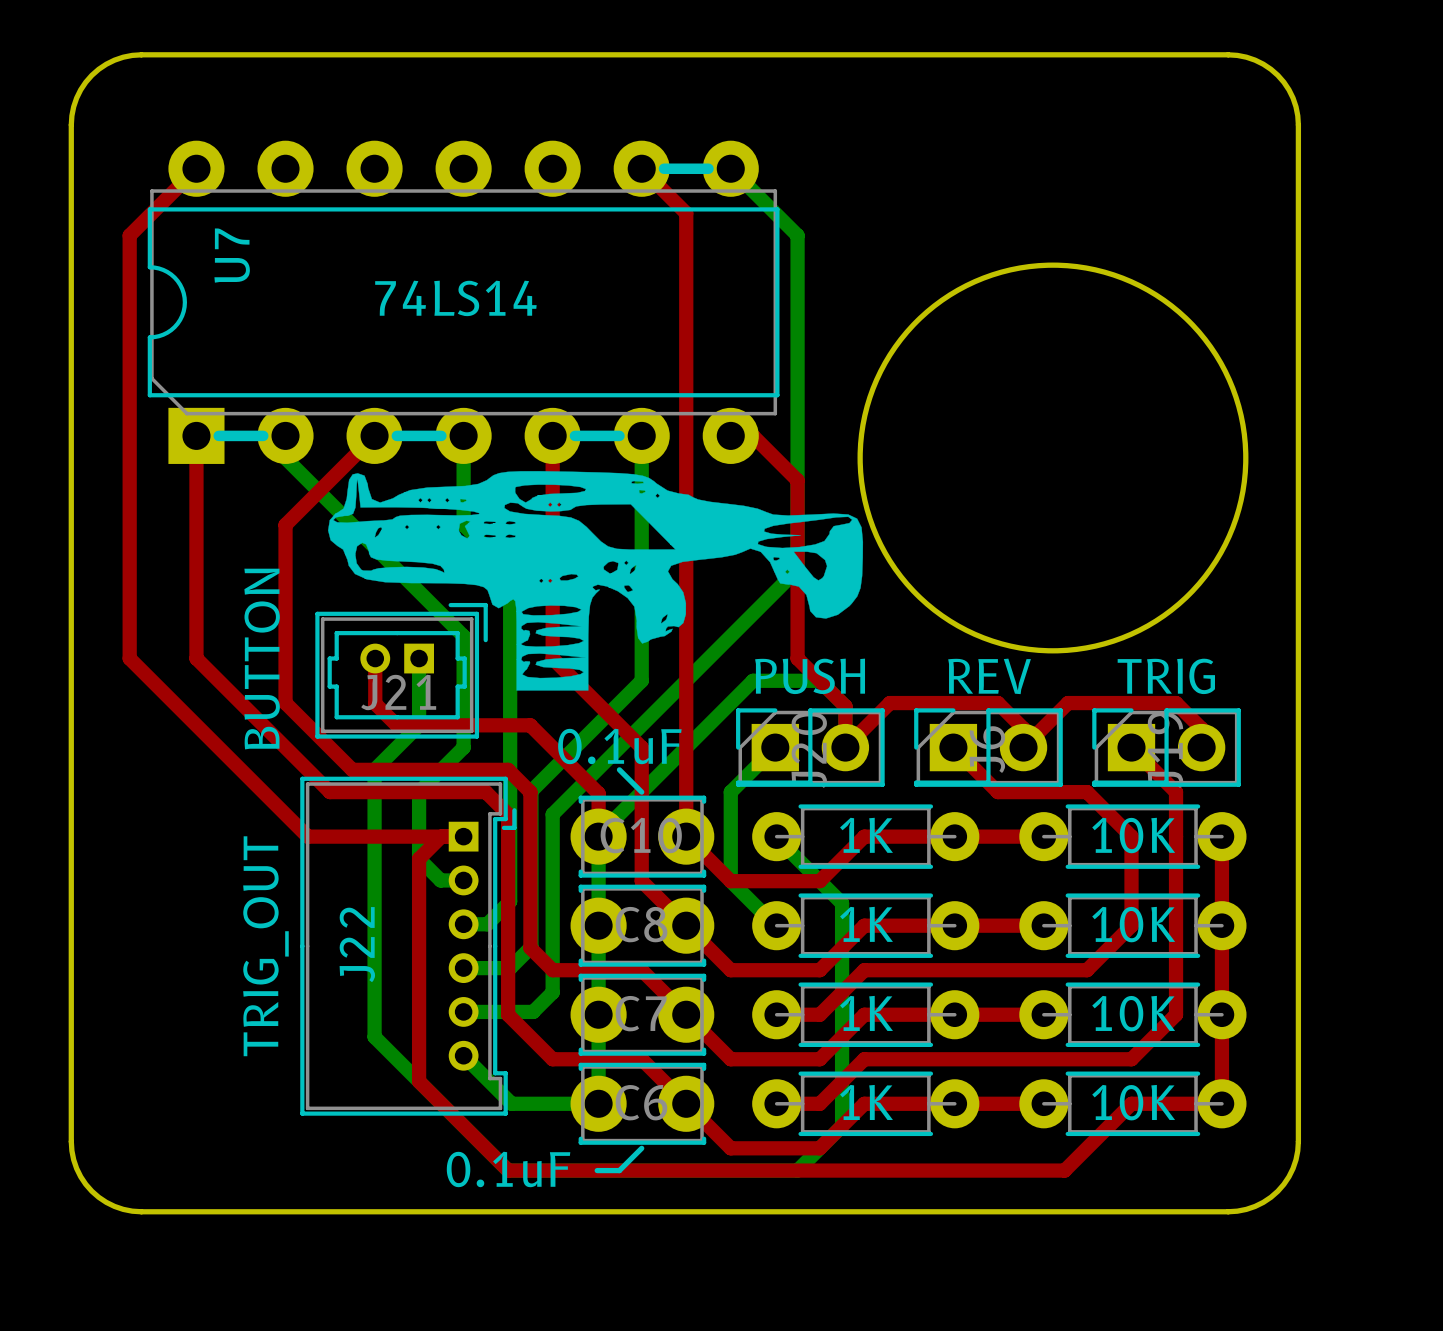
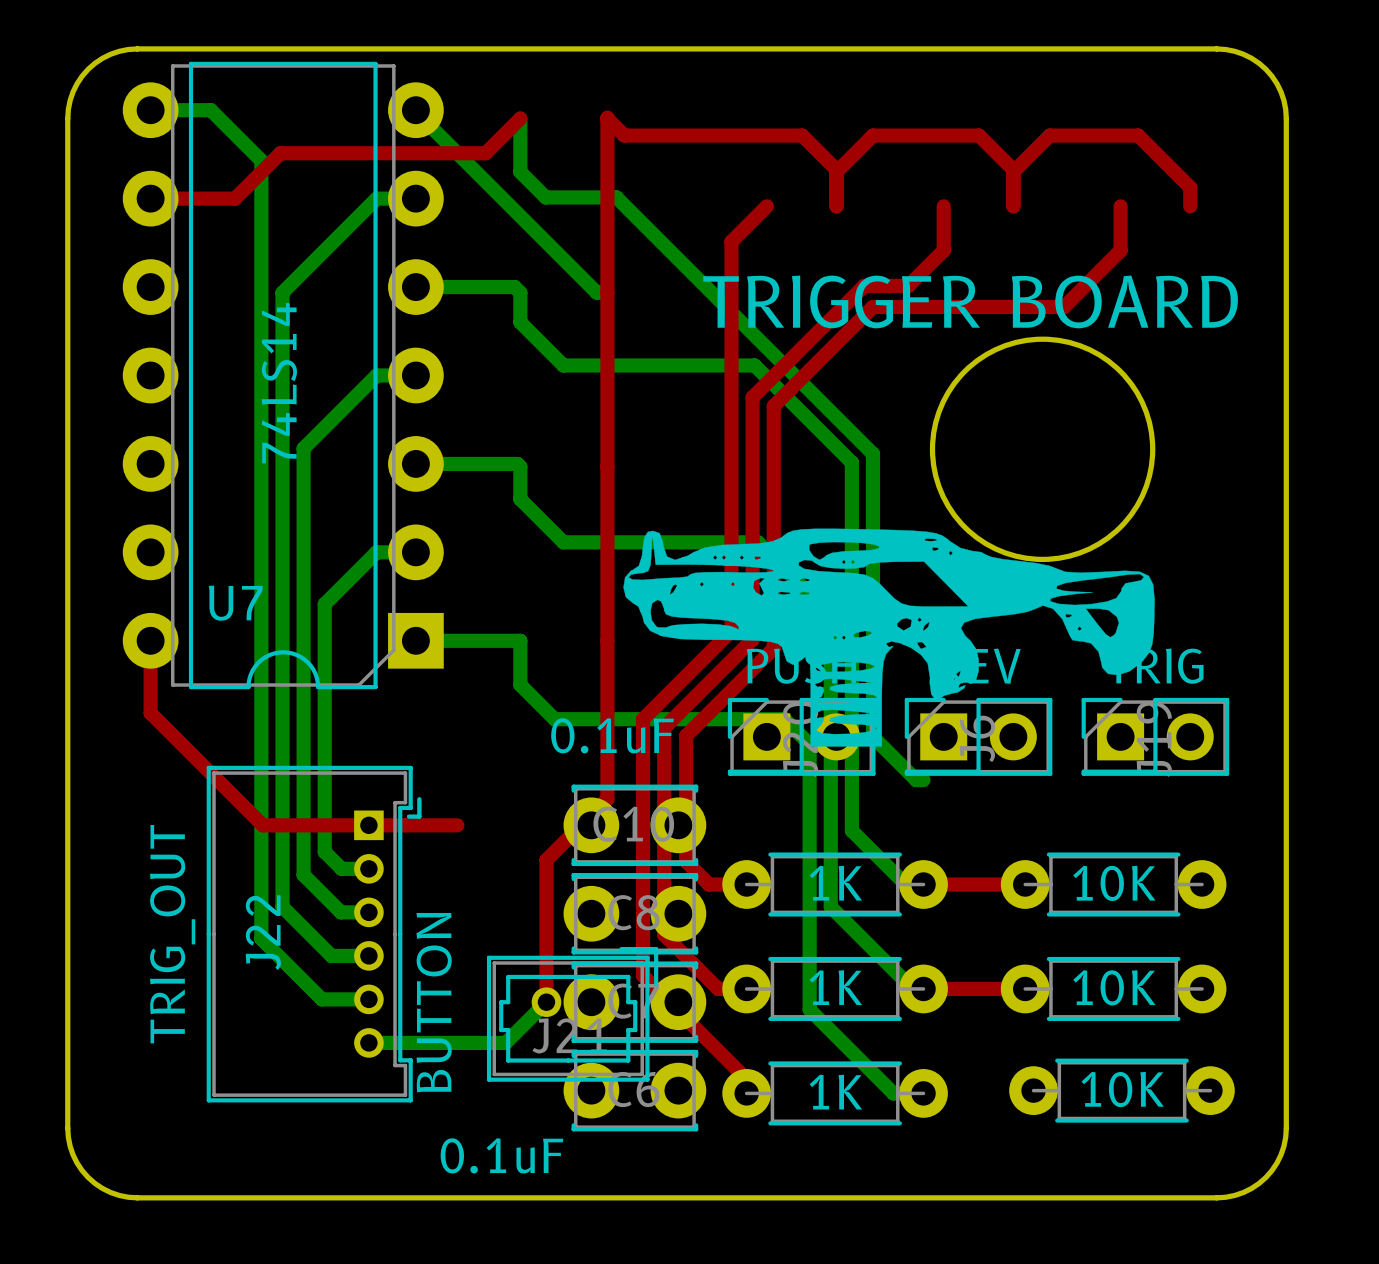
bottom track: none -> (150, 110) (210, 110) (261, 160) (261, 938) (321, 999) (368, 999)
bottom track: none -> (415, 110) (596, 292) (607, 292)
top track: none -> (607, 117) (607, 799) (546, 860) (546, 1002)
bottom track: none -> (520, 118) (520, 172) (545, 197) (616, 197) (872, 453) (872, 736) (916, 780) (923, 780)
top track: none -> (520, 118) (485, 153) (280, 153) (235, 198) (150, 198)
top track: none -> (607, 118) (624, 135) (802, 135) (836, 169) (836, 206)
top track: (196, 168) (129, 235) (129, 658) (307, 836) -> (150, 640) (150, 713) (262, 825) (302, 825)
top track: (641, 168) (686, 213) (686, 836) (730, 881) (819, 881) (864, 836) (1043, 836) -> none
line: (663, 168) (708, 168) -> none
bottom track: (730, 168) (797, 235) (797, 569) (552, 814) (552, 992) (533, 1011) (463, 1011) -> none
top track: none -> (836, 172) (872, 135) (979, 135) (1013, 169) (1013, 206)
top track: none -> (1013, 172) (1049, 135) (1138, 135) (1190, 187) (1190, 206)
bottom track: none -> (415, 198) (376, 198) (282, 292) (282, 906) (331, 955) (368, 955)
top track: none -> (766, 206) (731, 241) (731, 630) (643, 719) (643, 975) (746, 1079) (746, 1093)
top track: none -> (943, 206) (943, 250) (908, 285) (864, 285) (752, 397) (752, 639) (664, 727) (664, 934) (718, 988) (746, 988)
top track: none -> (1120, 206) (1120, 250) (1064, 306) (872, 306) (773, 406) (773, 648) (686, 735) (686, 861) (709, 884) (746, 884) (729, 884)
round board edge size: [857, 262, 1249, 654] -> [929, 336, 1156, 563]
bottom track: none -> (415, 287) (514, 287)
bottom track: none -> (520, 292) (520, 322) (563, 365) (754, 365) (851, 462) (851, 830) (905, 884) (923, 884)
U7 rotation: 0° (463, 302) -> 90° counterclockwise (283, 375)
text: none -> TRIGGER BOARD (970, 301)
bottom track: none -> (402, 375) (415, 375) (376, 375) (303, 448) (303, 874) (340, 912) (368, 912)
top track: (196, 435) (196, 658) (330, 792) (485, 792) (508, 814) (508, 1014) (552, 1059) (641, 1059) (730, 1148) (819, 1148) (864, 1103) (1043, 1103) -> none
line: (218, 435) (263, 435) -> none
bottom track: (285, 435) (285, 458) (463, 636) (463, 747) (419, 792) (419, 858) (440, 880) (463, 880) -> none
top track: (374, 435) (285, 524) (285, 703) (352, 769) (508, 769) (530, 792) (530, 947) (552, 970) (641, 970) (730, 1059) (819, 1059) (864, 1014) (1043, 1014) -> none
line: (396, 435) (441, 435) -> none
bottom track: (463, 435) (463, 524) (510, 571) (510, 901) (487, 924) (463, 924) -> none
top track: (552, 435) (552, 658) (641, 747) (641, 881) (730, 970) (819, 970) (864, 925) (1043, 925) -> none
line: (574, 435) (619, 435) -> none
bottom track: (641, 435) (641, 680) (531, 791) (531, 946) (510, 968) (463, 968) -> none
top track: (730, 435) (753, 435) (797, 480) (797, 658) (845, 706) (845, 747) (889, 703) (997, 703) (1023, 728) (1023, 747) (1068, 703) (1176, 703) (1201, 728) (1201, 747) -> none
bottom track: none -> (415, 463) (517, 463)
bottom track: none -> (520, 466) (520, 499) (563, 542) (758, 542) (830, 615) (830, 906) (912, 988) (923, 988)
bottom track: none -> (415, 552) (376, 552) (324, 604) (324, 851) (341, 868) (368, 868)
drawing position: (595, 580) -> (889, 637)
bottom track: none -> (415, 640) (520, 640) (520, 684) (554, 719) (784, 719) (809, 744) (809, 1009) (893, 1093) (923, 1093)
top track: (375, 658) (375, 703) (396, 725) (530, 725) (598, 793) (598, 836) -> none
bottom track: (419, 658) (419, 725) (374, 769) (374, 1037) (508, 1170) (797, 1170) (842, 1126) (842, 903) (776, 836) -> none
J21 position: (401, 670) -> (572, 1014)
bottom track: (775, 747) (730, 792) (730, 881) (776, 925) -> none
bottom track: (845, 747) (845, 706) (819, 680) (753, 680) (598, 835) (598, 1103) (511, 1103) (463, 1055) -> none
top track: (953, 747) (997, 792) (1086, 792) (1131, 836) (1131, 925) (1086, 970) (864, 970) (819, 1014) (776, 1014) -> none
top track: (1131, 747) (1176, 792) (1176, 1014) (1131, 1059) (864, 1059) (819, 1103) (776, 1103) -> none
line: (619, 769) (641, 792) -> none
top track: (441, 836) (419, 858) (419, 1081) (508, 1170) (1064, 1170) (1131, 1103) (1221, 1103) (1221, 836) -> none
part: 1K (865, 836) -> none
part: 10K (1132, 836) -> none
part: none -> 1K (835, 884)
top track: none -> (923, 884) (1025, 884)
part: none -> 10K (1113, 884)
part: 1K (865, 925) -> none
part: 10K (1132, 925) -> none
J22 position: (408, 946) -> (314, 934)
top track: none -> (923, 988) (1025, 988)
bottom track: none -> (546, 1002) (505, 1042) (368, 1042)
part position: (865, 1014) -> (835, 988)
part position: (1132, 1014) -> (1113, 988)
part position: (865, 1103) -> (835, 1093)
line: (641, 1148) (619, 1170) (597, 1170) -> none

